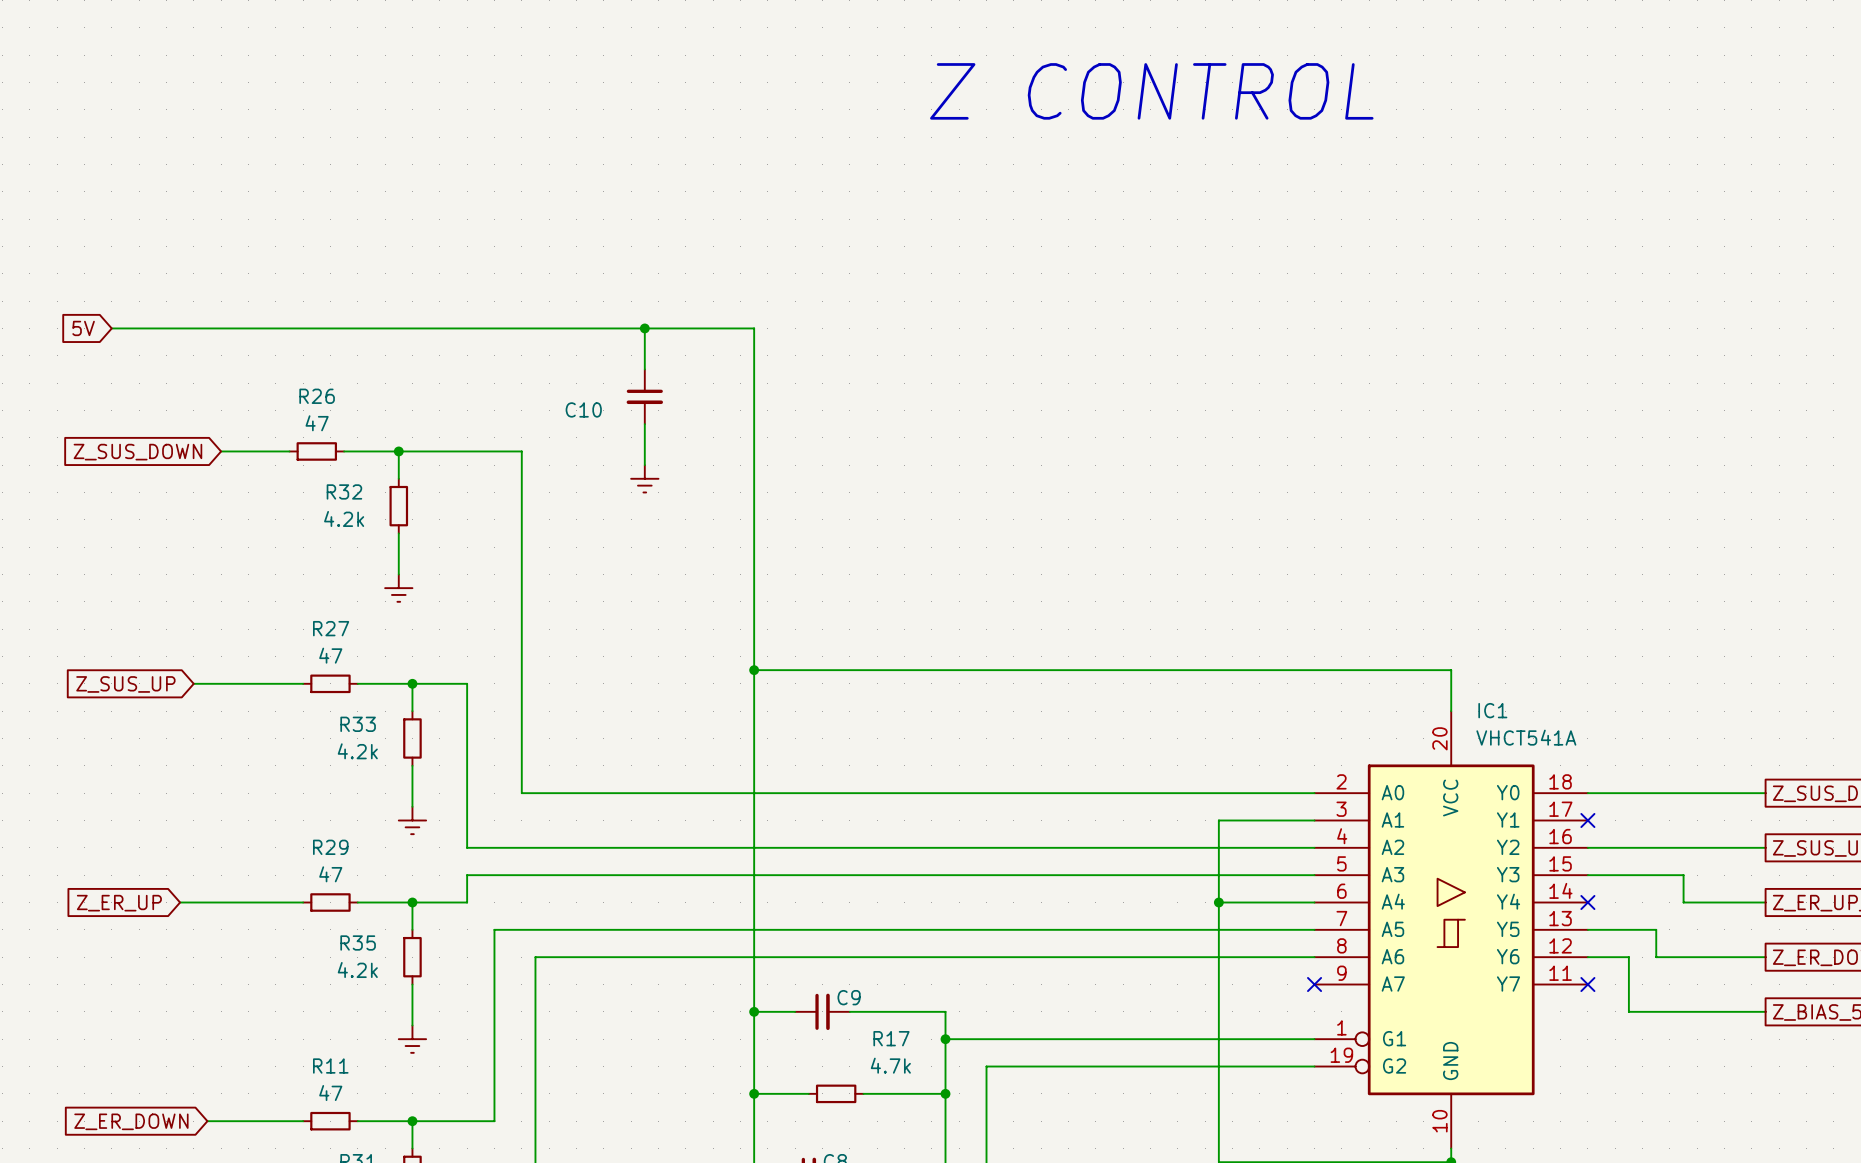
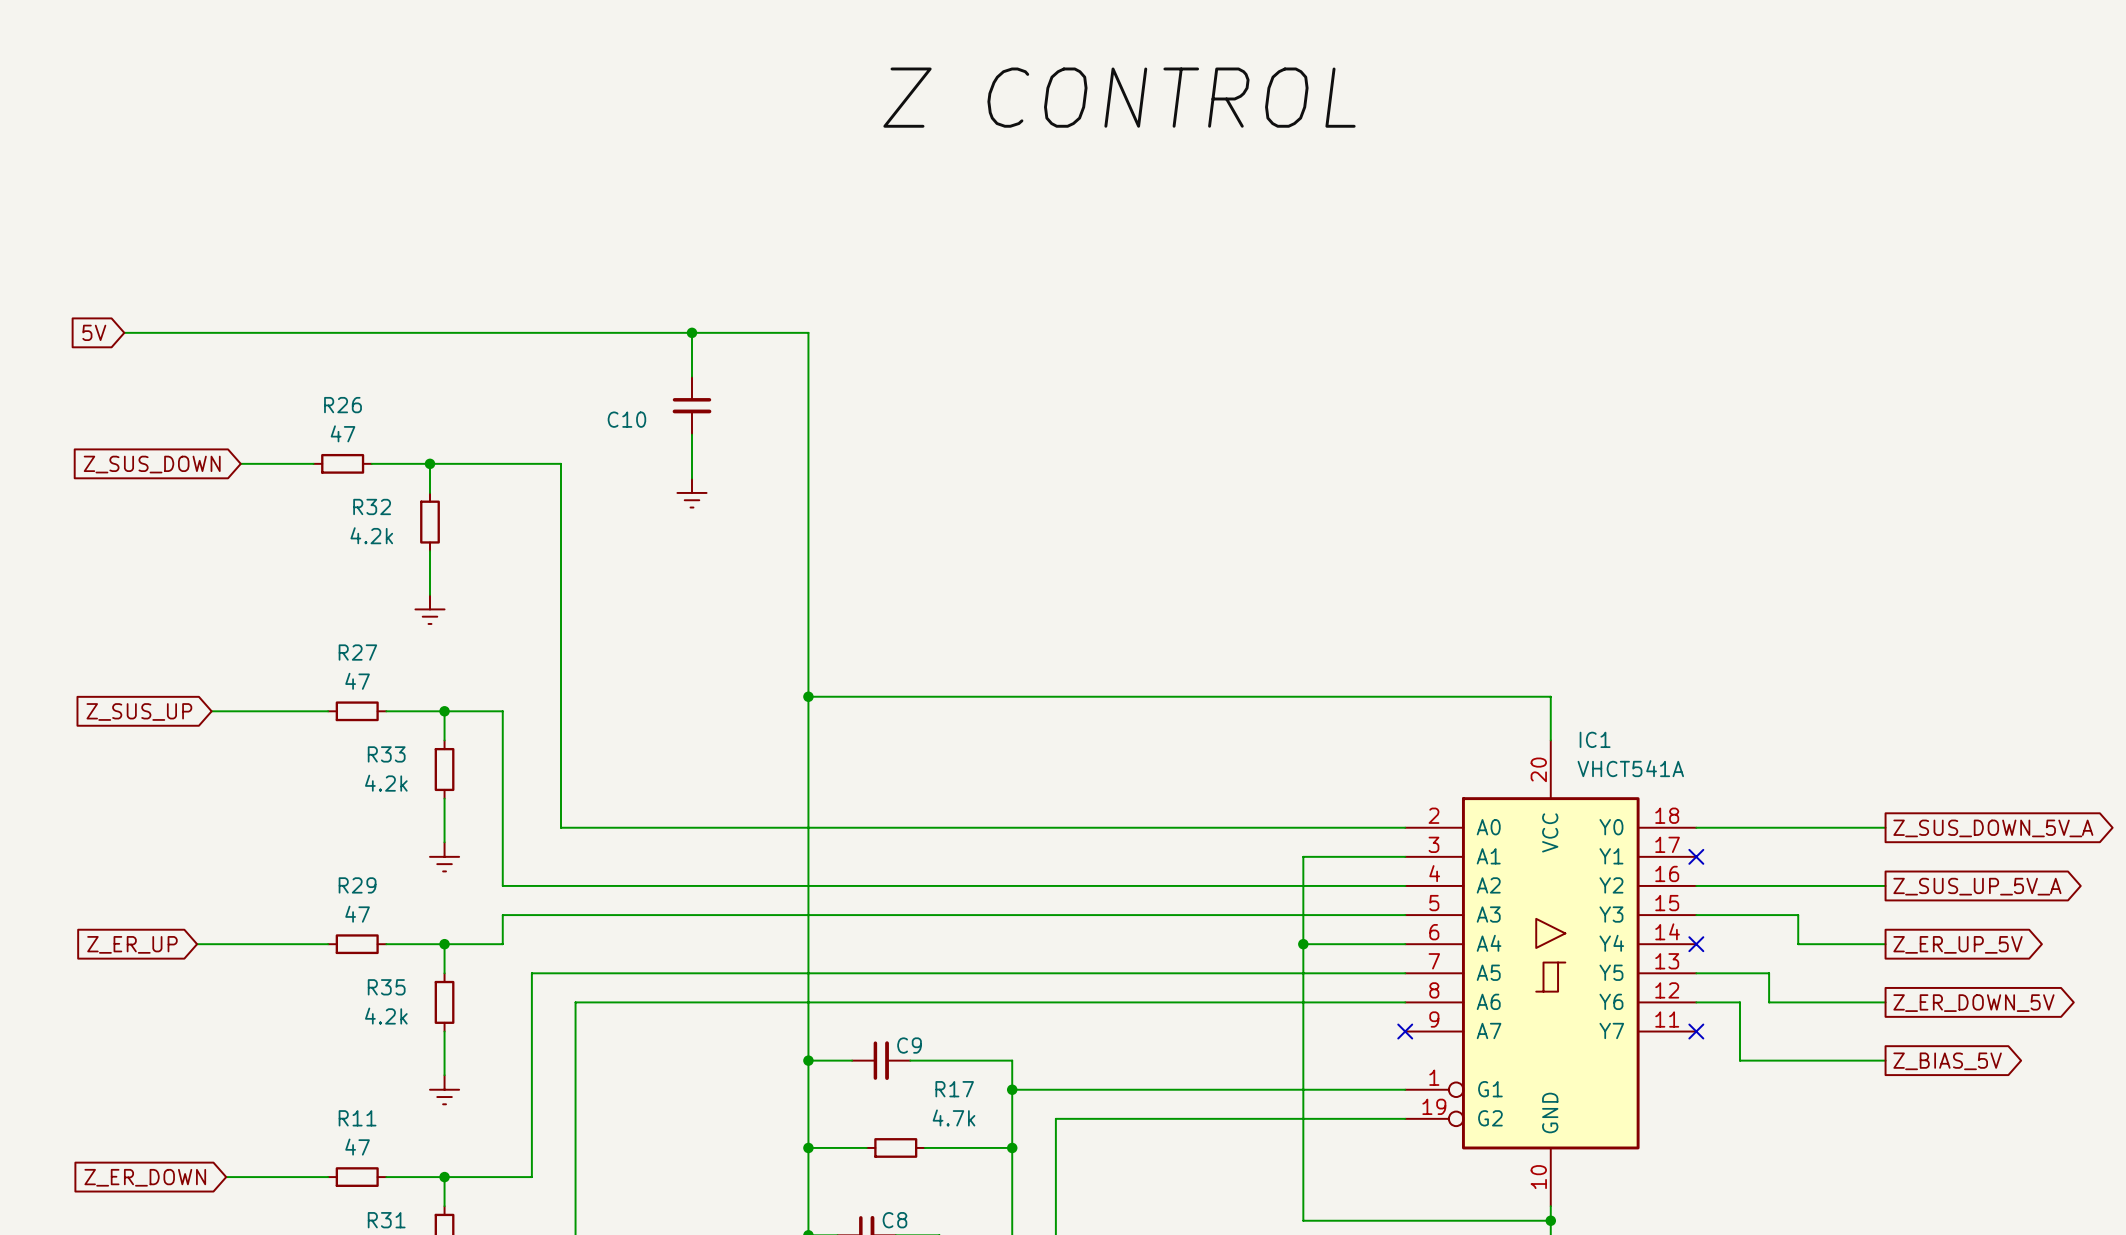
text: Z CONTROL (1151, 91) -> none
label: none -> Z CONTROL (1119, 97)

